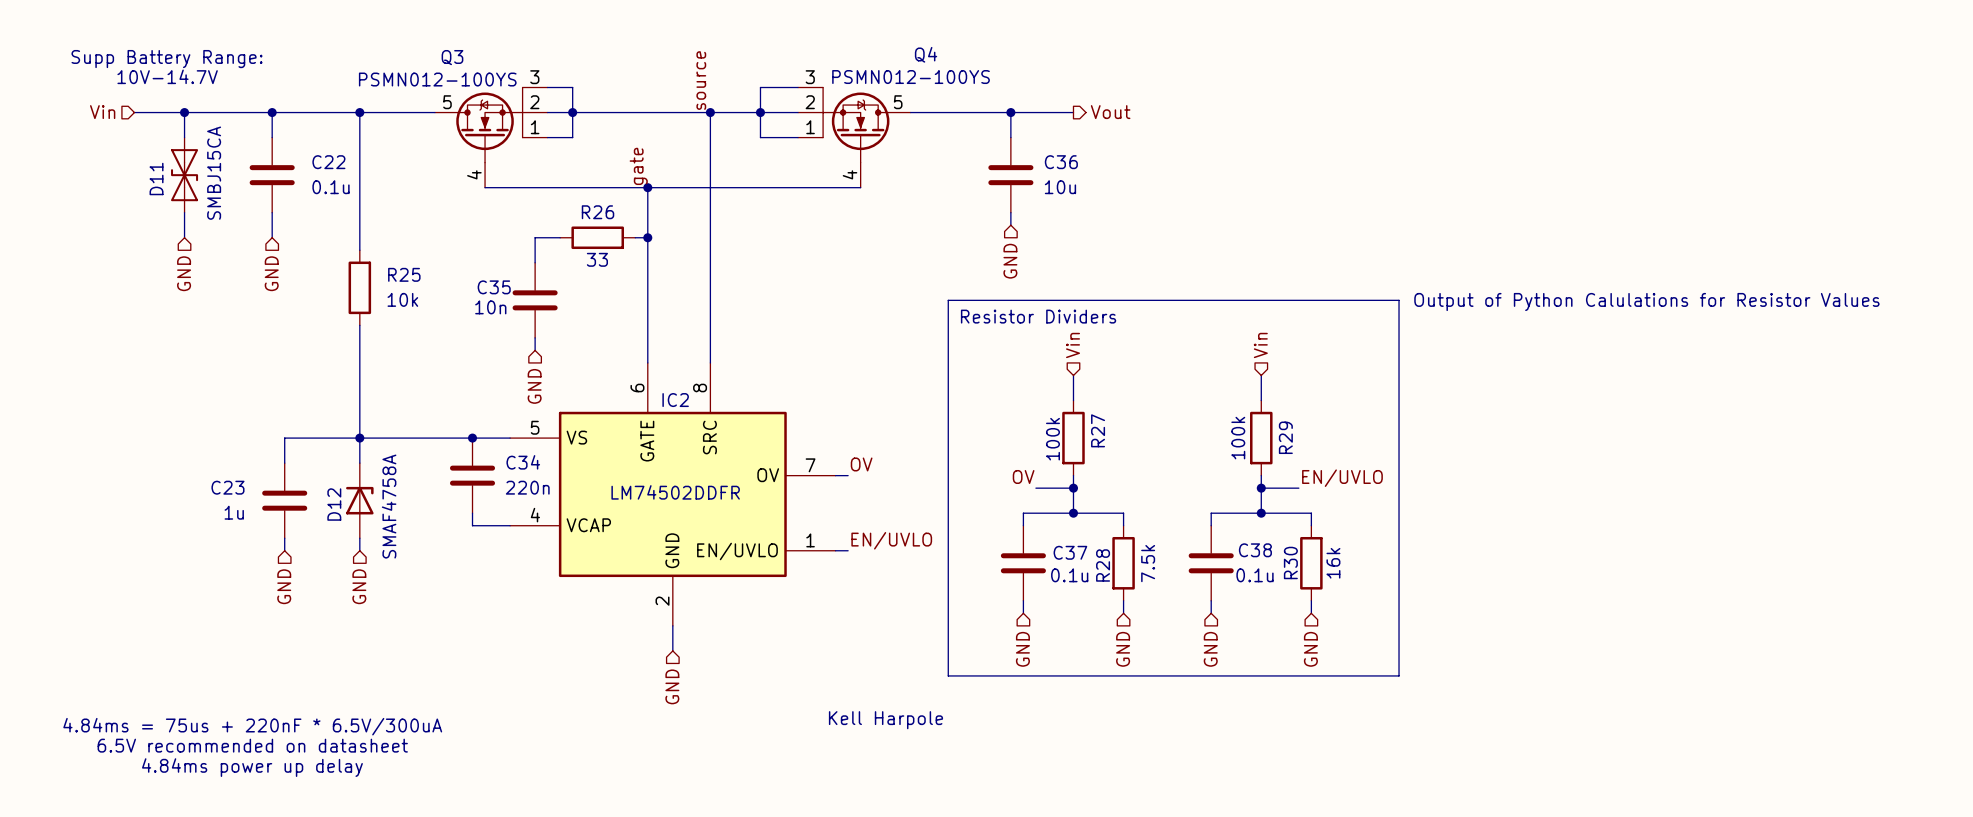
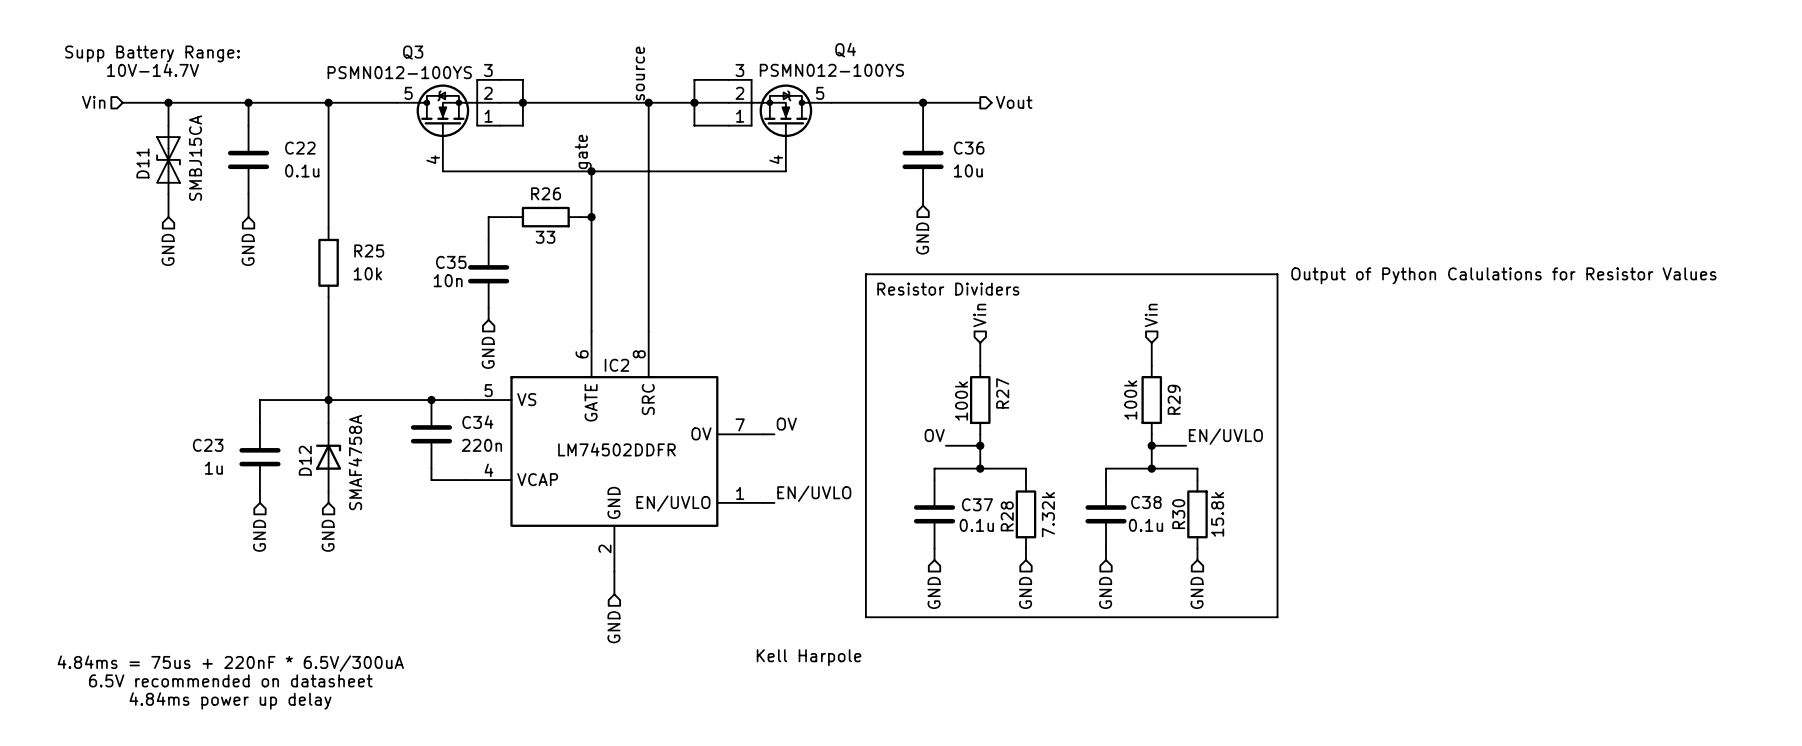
R28 value: 7.5k (1148, 563) -> 7.32k (1048, 514)
R30 value: 16k (1333, 563) -> 15.8k (1217, 514)

